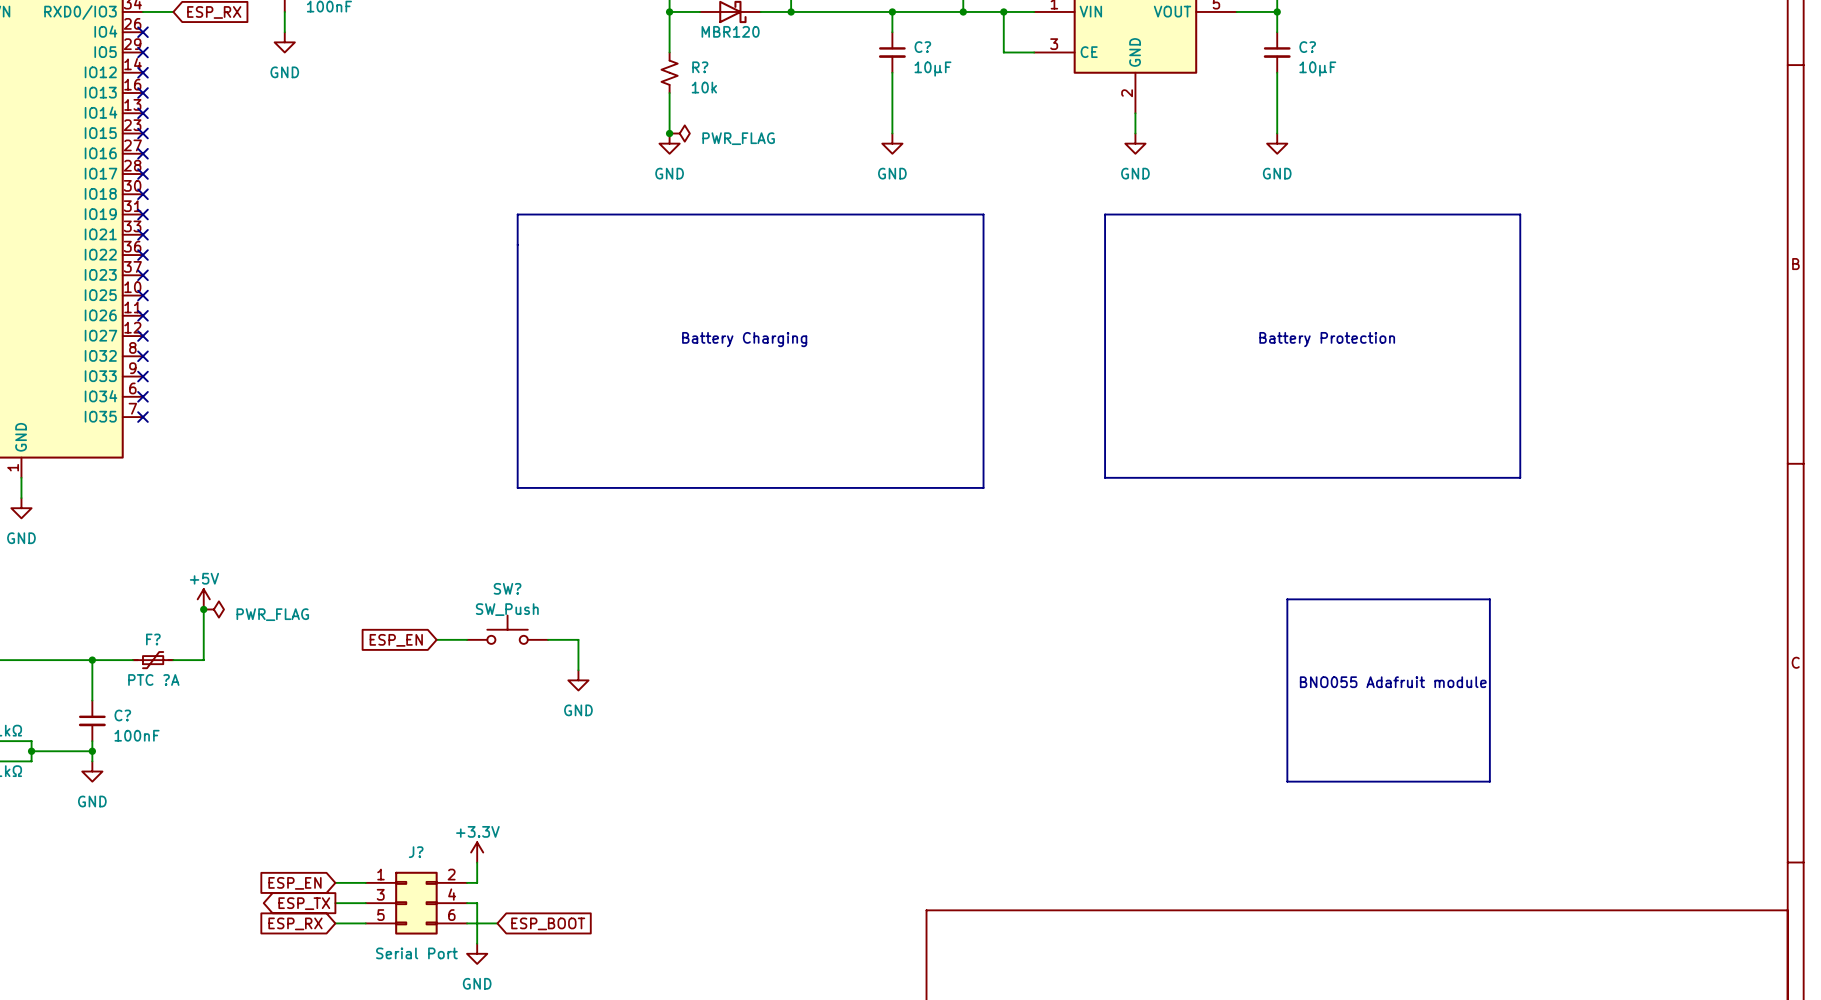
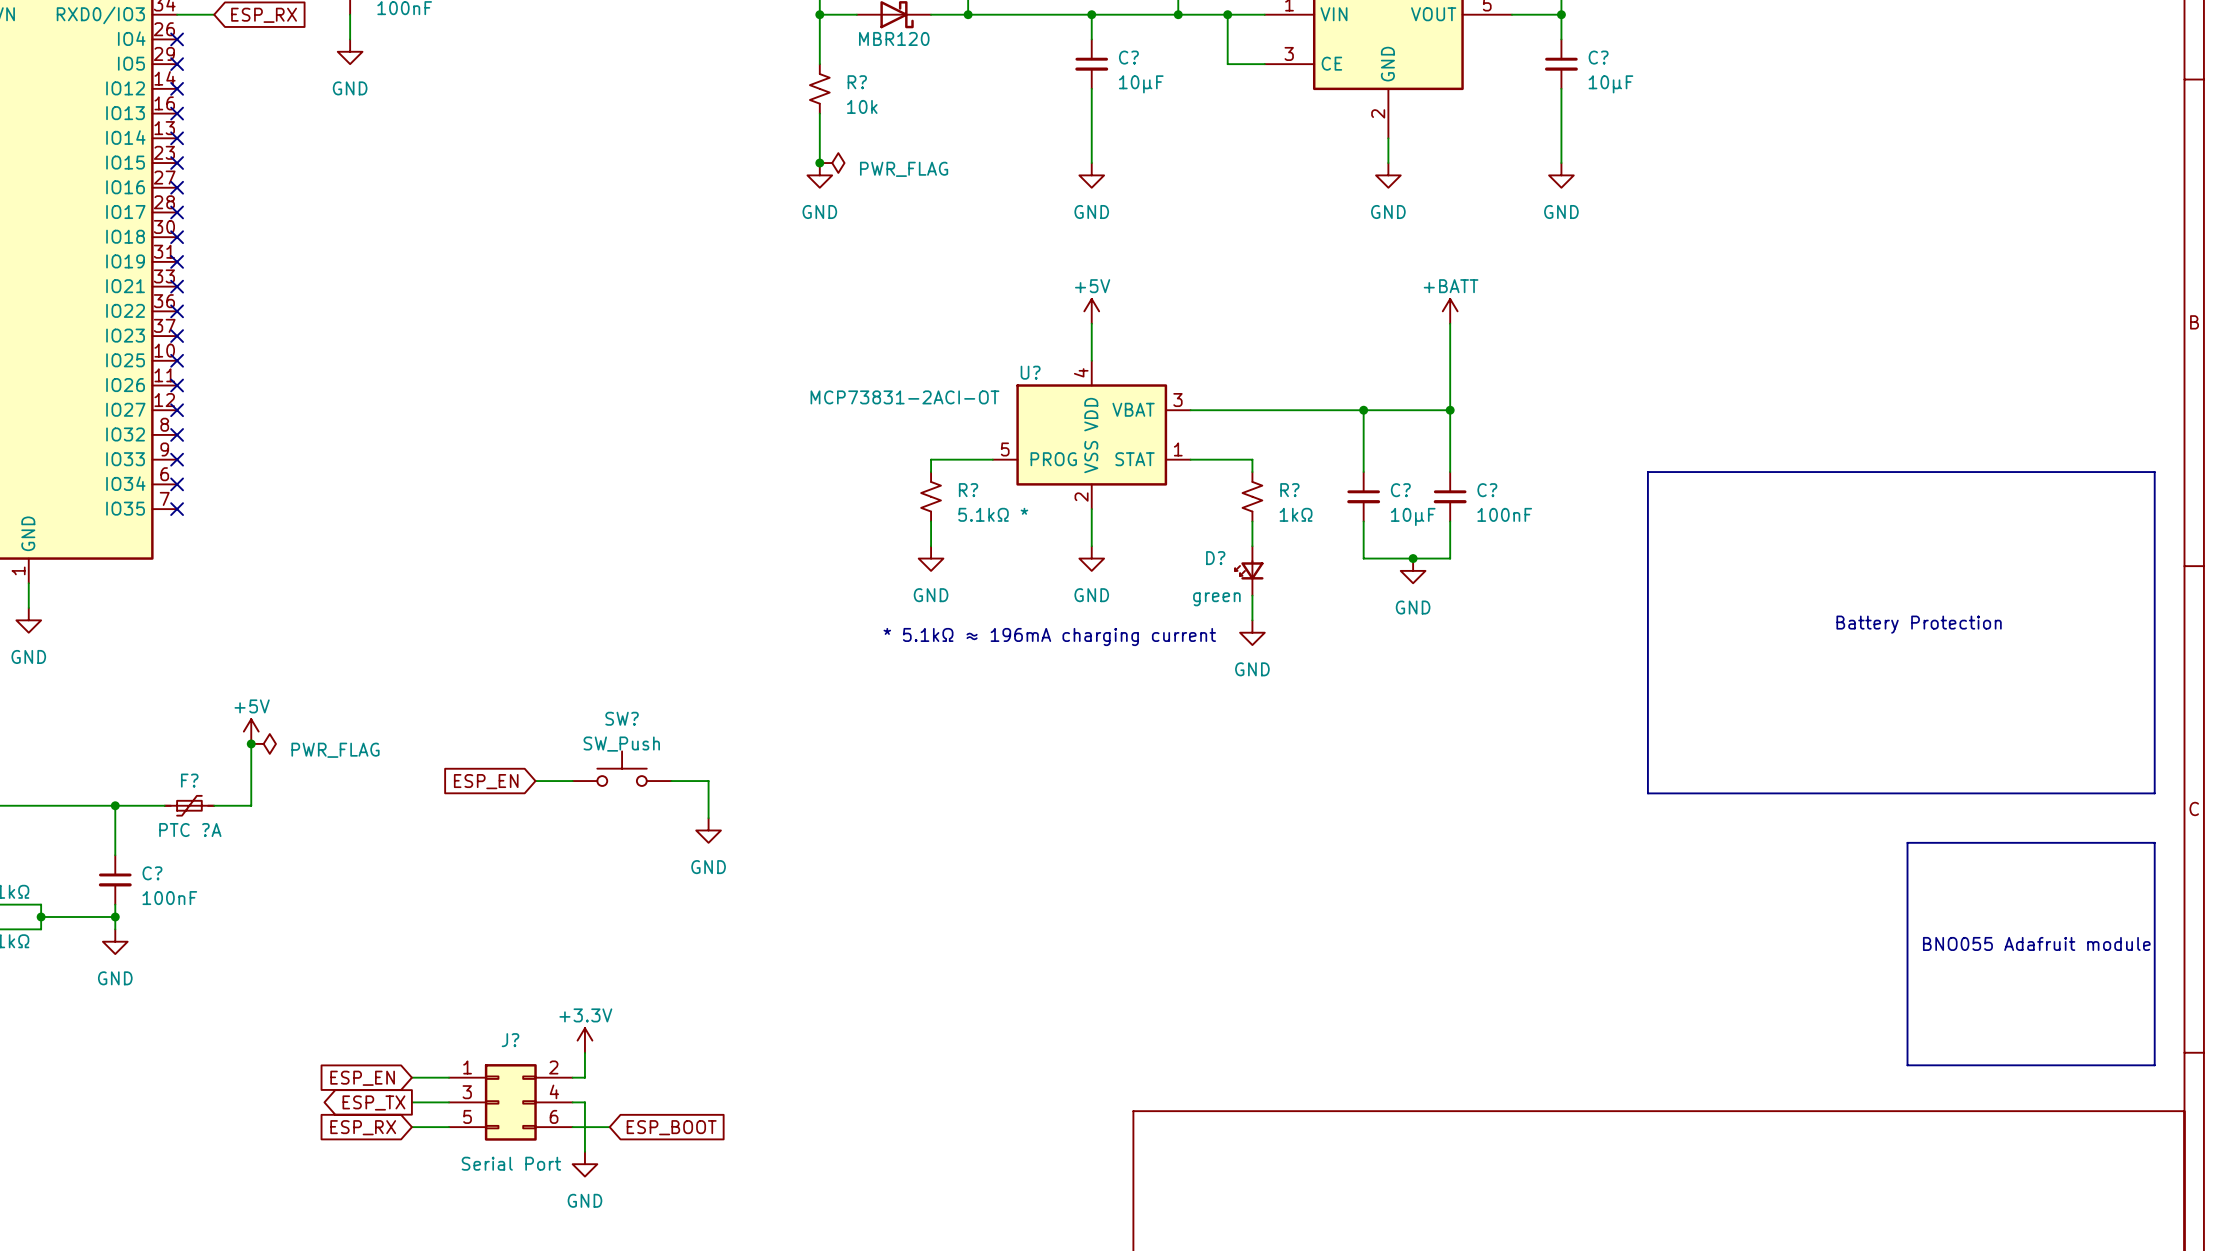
line: (517, 214) (983, 214) (983, 487) (517, 487) (517, 214) -> none
line: (1105, 214) (1520, 214) (1520, 477) (1105, 477) (1105, 214) -> none
power symbol: none -> +5V (1091, 311)
power symbol: none -> +BATT (1450, 311)
wire: none -> (1091, 323) (1091, 360)
wire: none -> (1450, 323) (1450, 472)
wire: none -> (1190, 410) (1450, 410)
wire: none -> (1363, 410) (1363, 472)
junction: none -> (1363, 410)
junction: none -> (1450, 410)
text: Battery Charging (744, 339) -> none
text: Battery Protection (1327, 339) -> none
U?: none -> MCP73831-2ACI-OT (1091, 434)
wire: none -> (992, 459) (931, 459) (931, 472)
wire: none -> (1190, 459) (1252, 459) (1252, 472)
line: none -> (1647, 472) (1647, 793) (2154, 793) (2154, 472) (1647, 472)
R?: none -> 5.1kΩ * (931, 496)
R?: none -> 1kΩ (1252, 496)
C?: none -> 10µF (1363, 496)
C?: none -> 100nF (1450, 496)
wire: none -> (1091, 509) (1091, 546)
wire: none -> (931, 521) (931, 546)
wire: none -> (1252, 521) (1252, 546)
wire: none -> (1363, 521) (1363, 558) (1450, 558) (1450, 521)
power symbol: none -> GND (931, 558)
power symbol: none -> GND (1091, 558)
junction: none -> (1413, 558)
D?: none -> green (1249, 570)
power symbol: none -> GND (1413, 570)
wire: none -> (1252, 595) (1252, 620)
text: none -> Battery Protection (1919, 624)
power symbol: none -> GND (1252, 632)
text: none -> * 5.1kΩ ≈ 196mA charging current (1049, 637)
line: (1287, 599) (1287, 781) (1489, 781) (1489, 599) (1287, 599) -> none
text: BNO055 Adafruit module (1393, 682) -> none
line: none -> (1907, 842) (1907, 1065) (2154, 1065) (2154, 842) (1907, 842)
text: none -> BNO055 Adafruit module (2036, 943)

